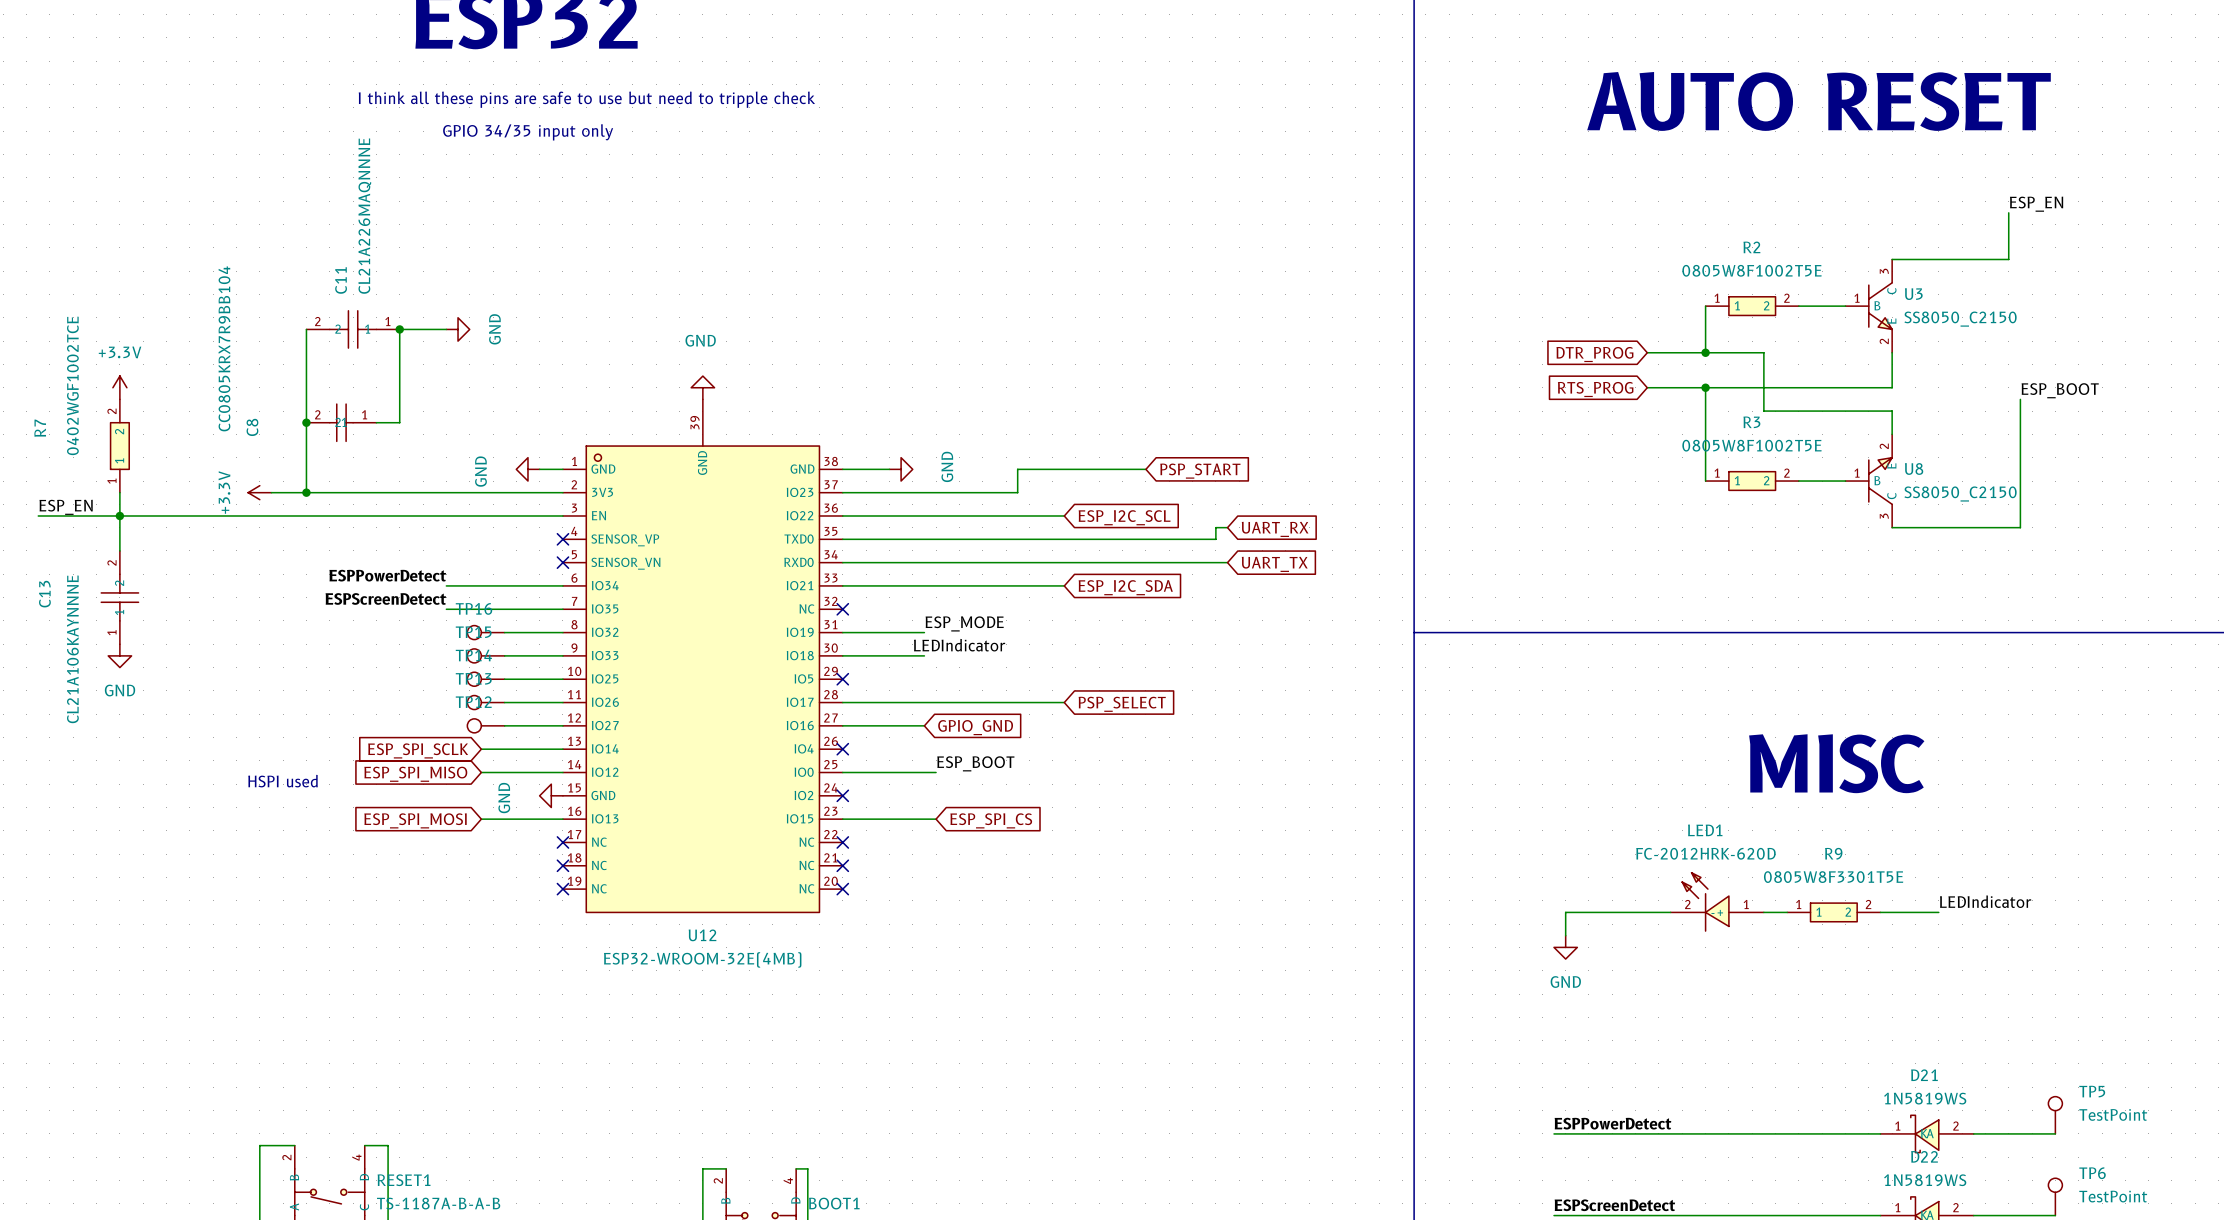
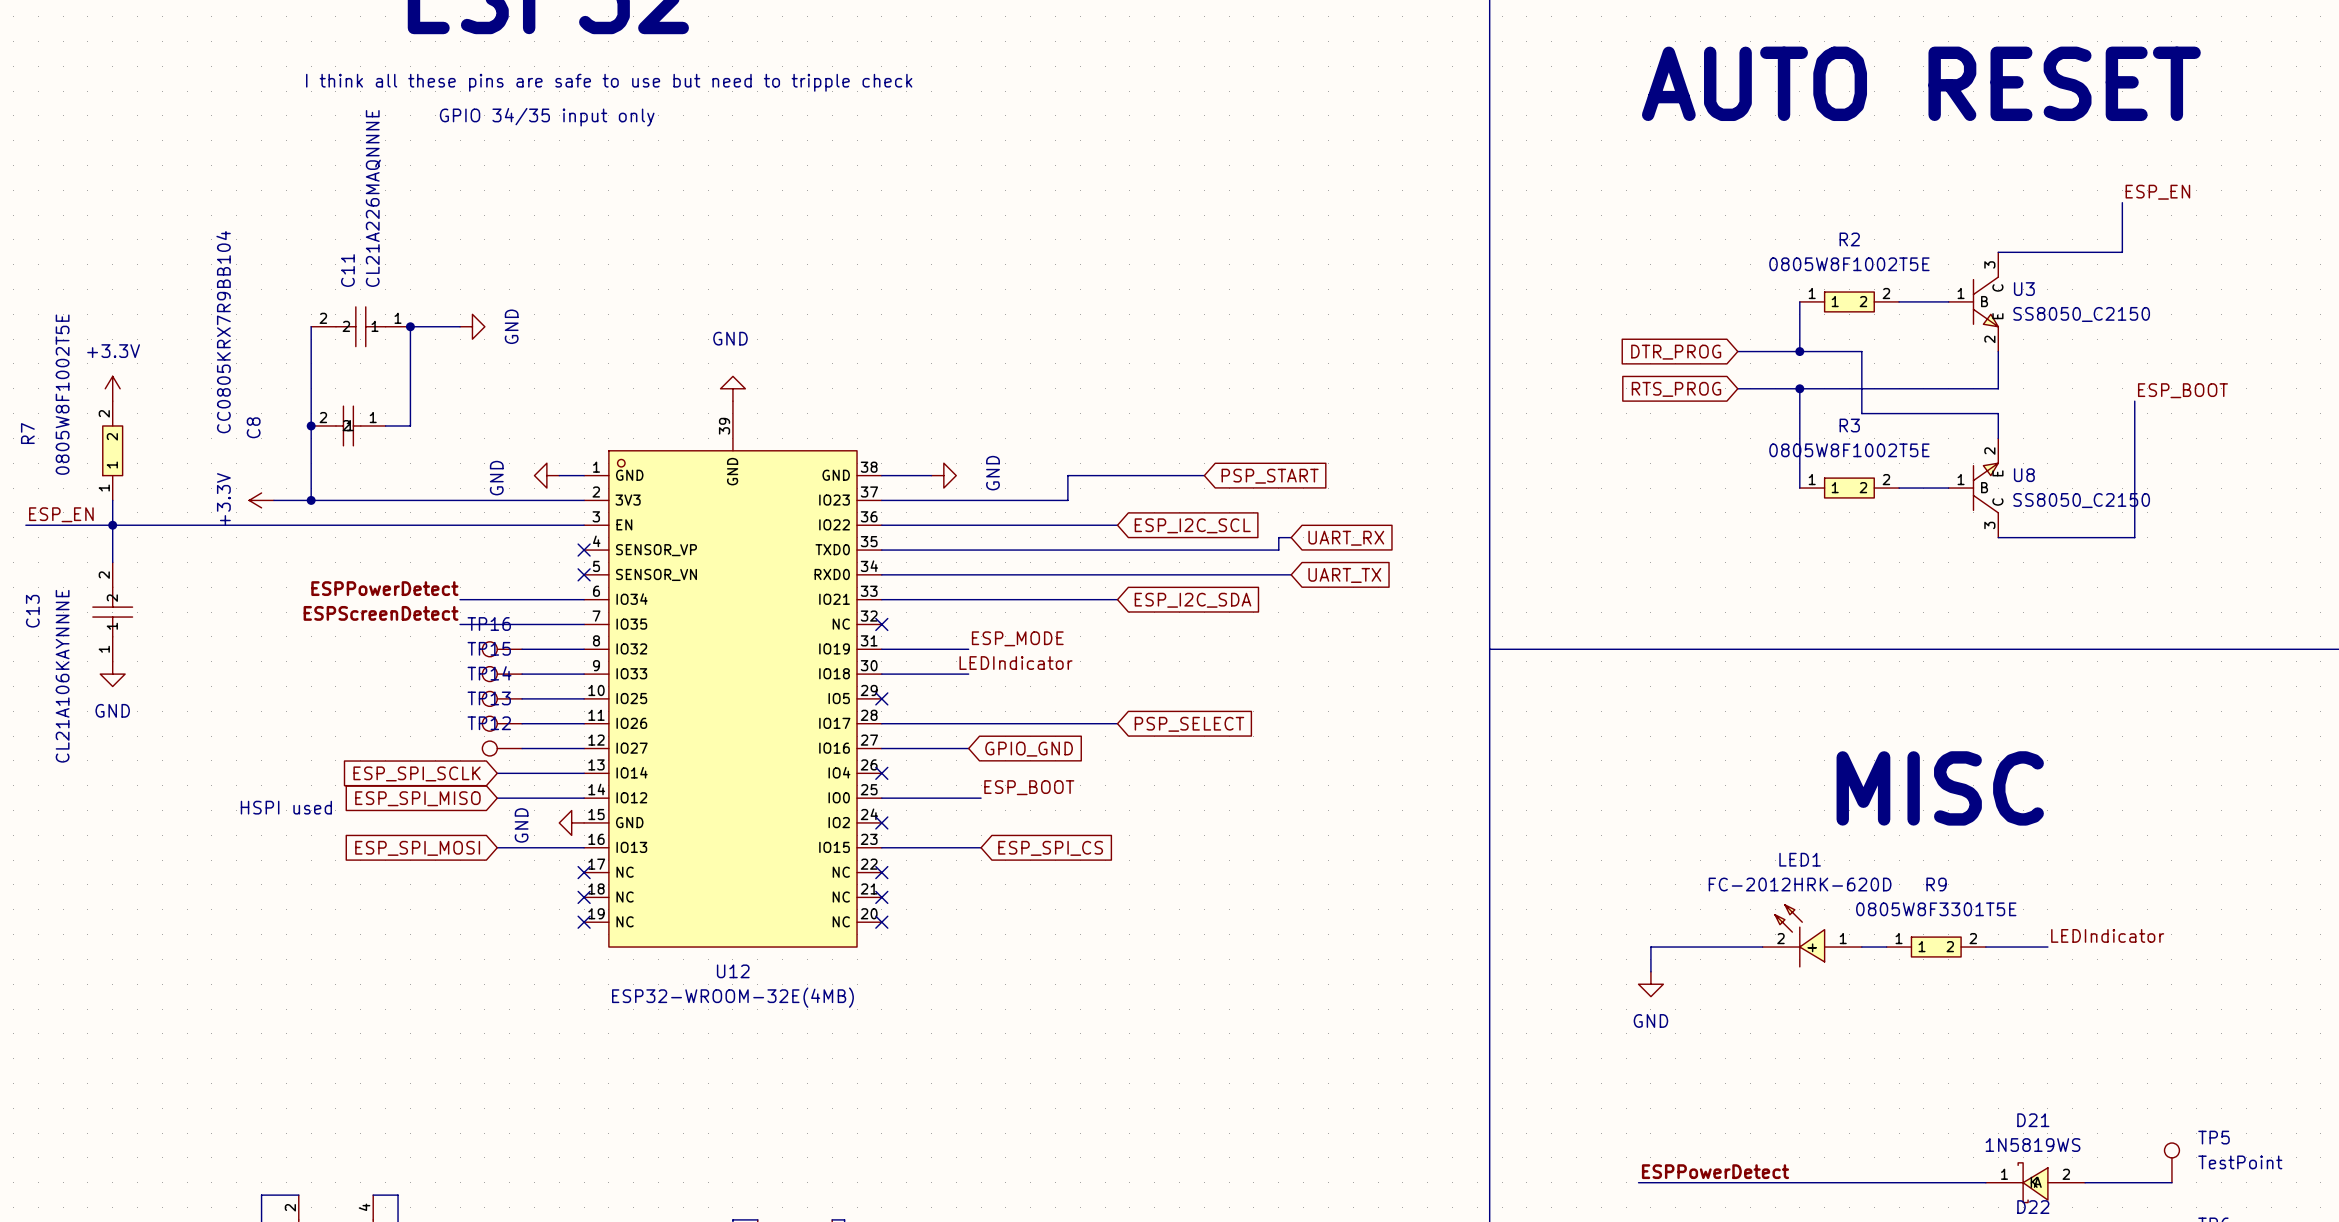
R7 value: 0402WGF1002TCE (72, 385) -> 0805W8F1002T5E (62, 394)

